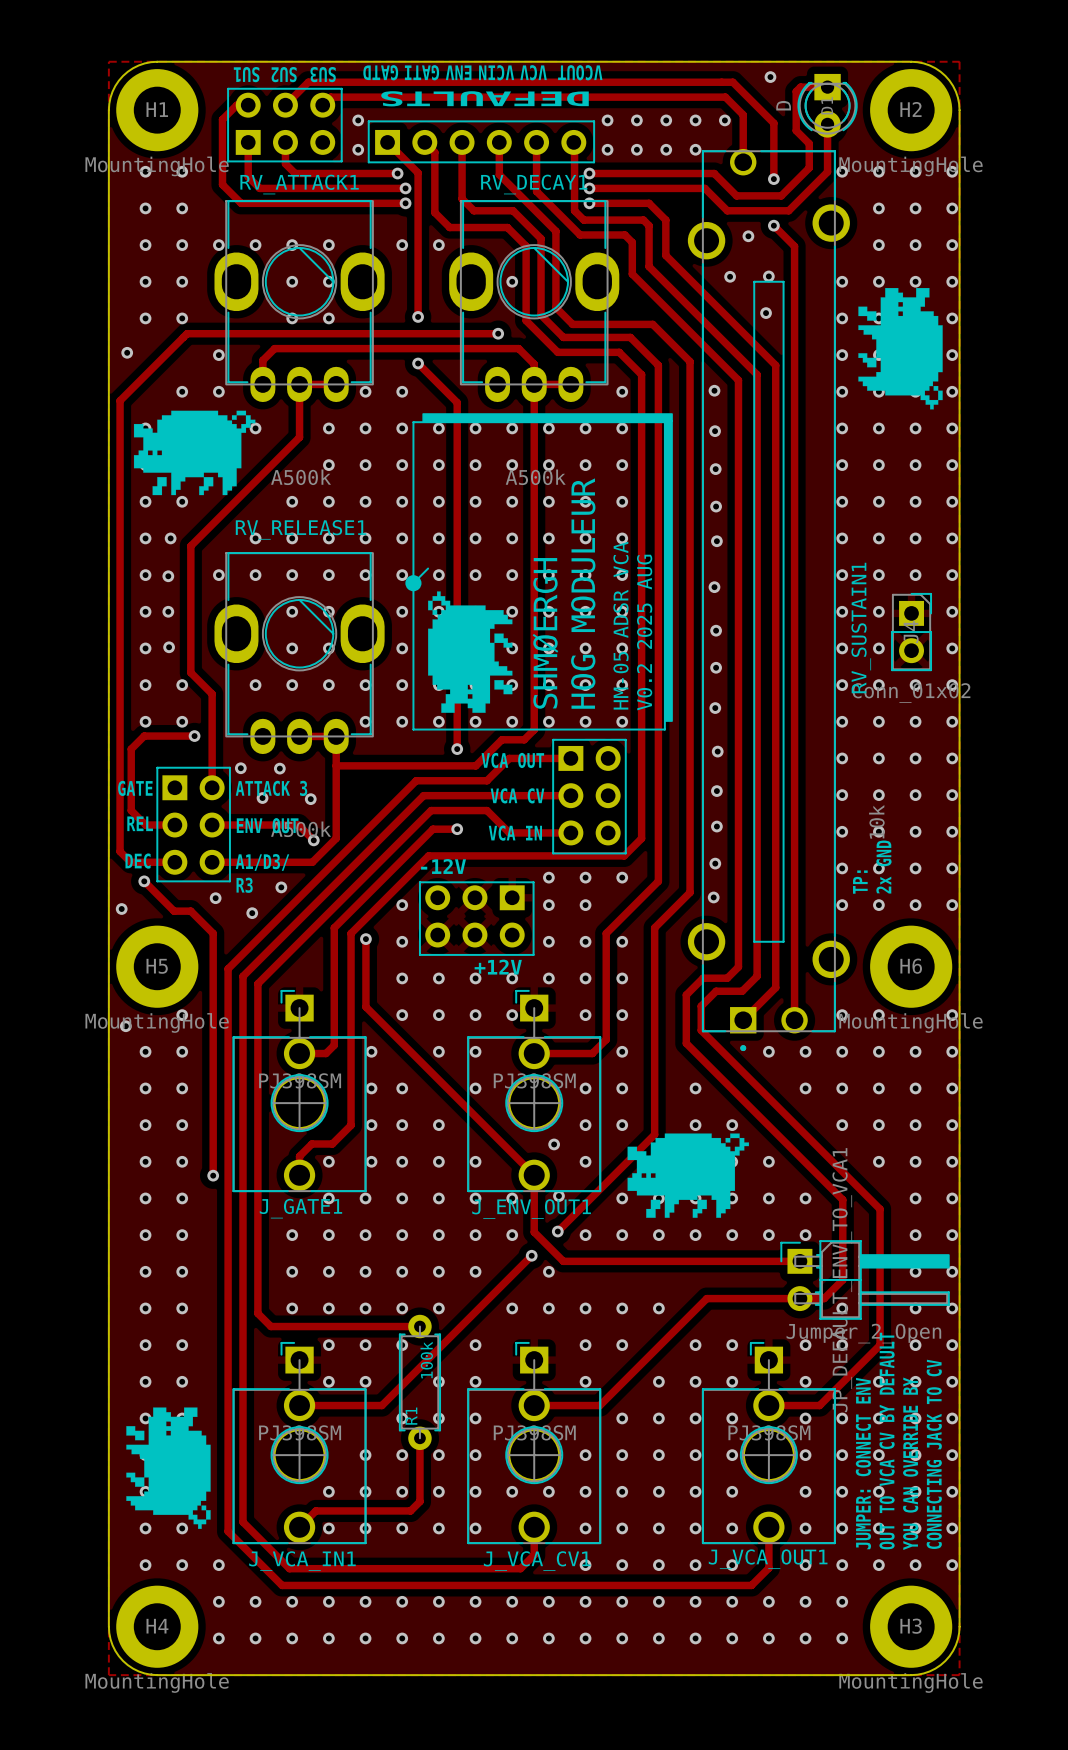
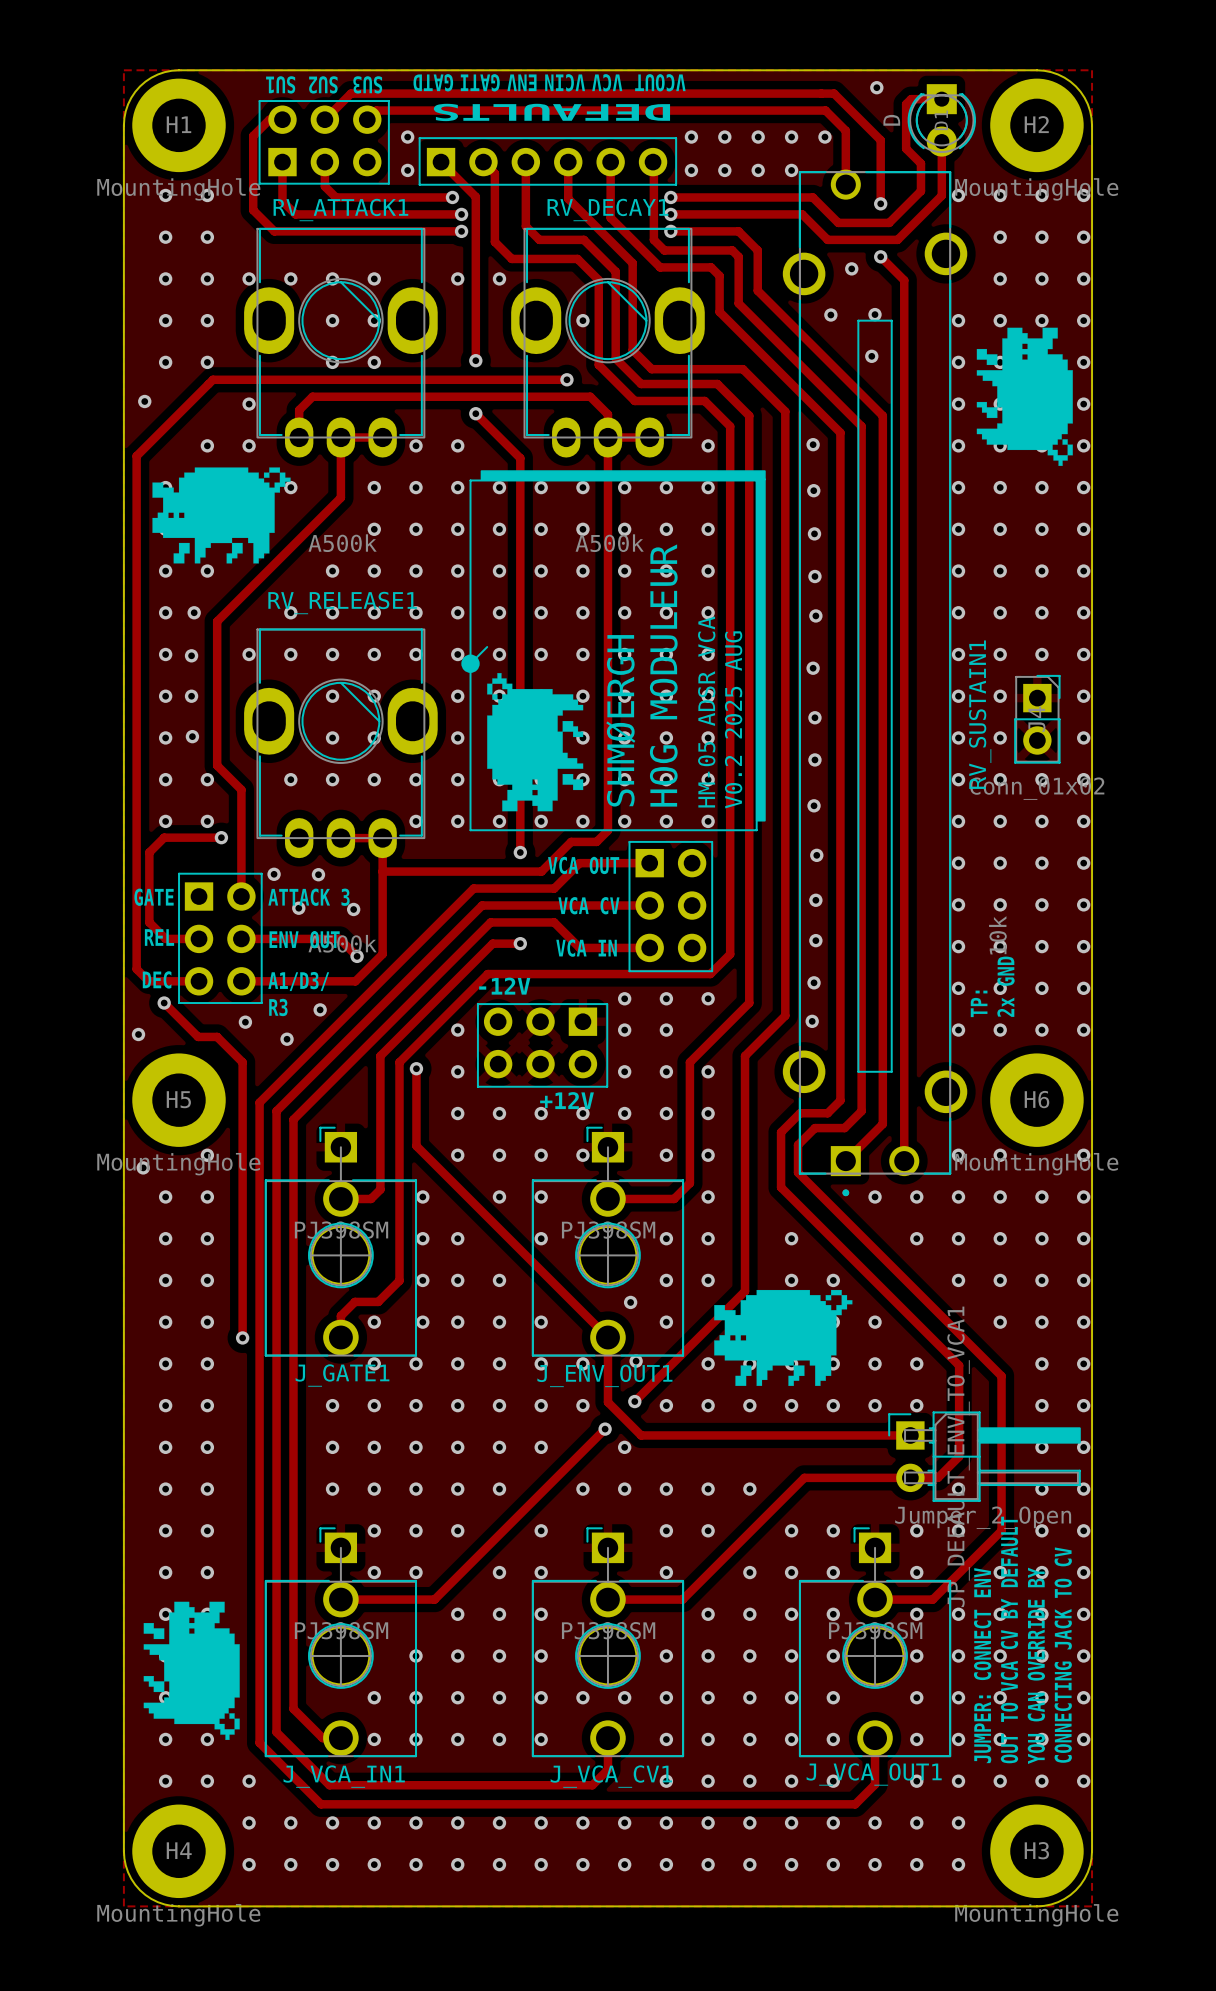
track: (257, 1313) (270, 1326) (419, 1326) -> none
R1: 100k (419, 1382) -> none
track: (419, 1438) (419, 1501) (410, 1510) (315, 1510) (299, 1527) -> (293, 1494) (293, 1708) (322, 1738) (340, 1738)

